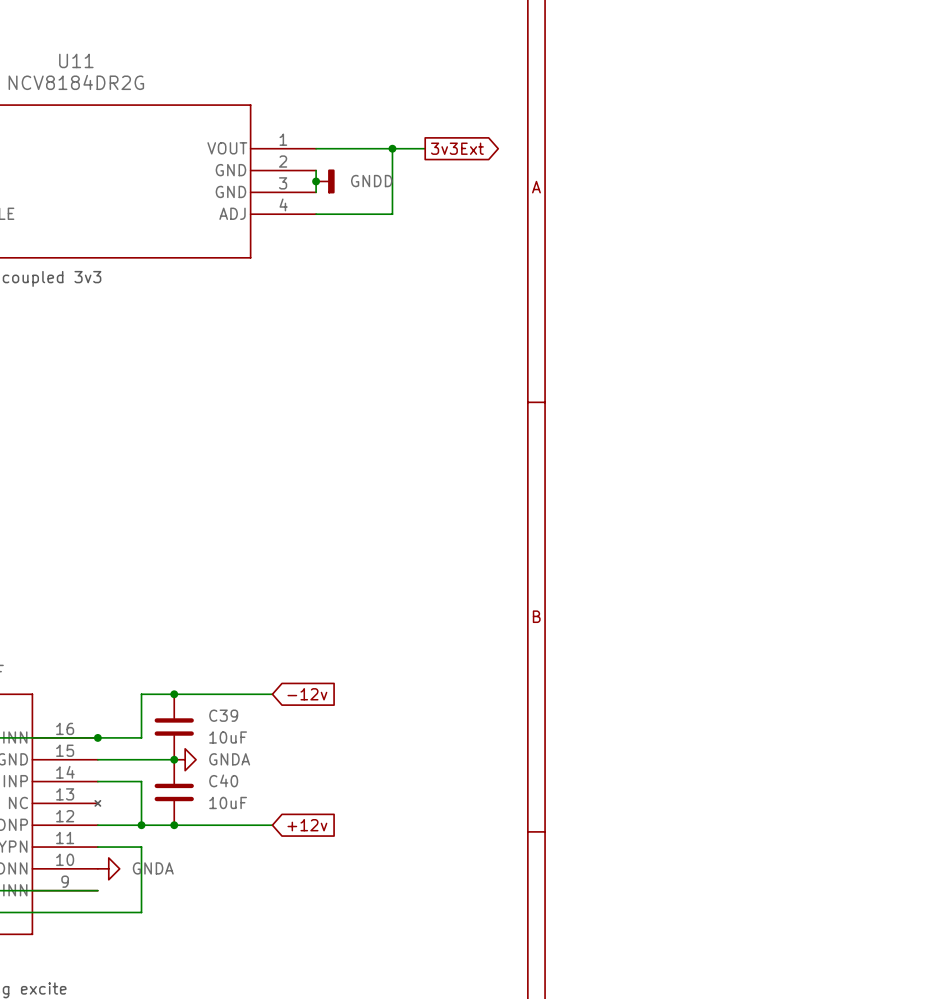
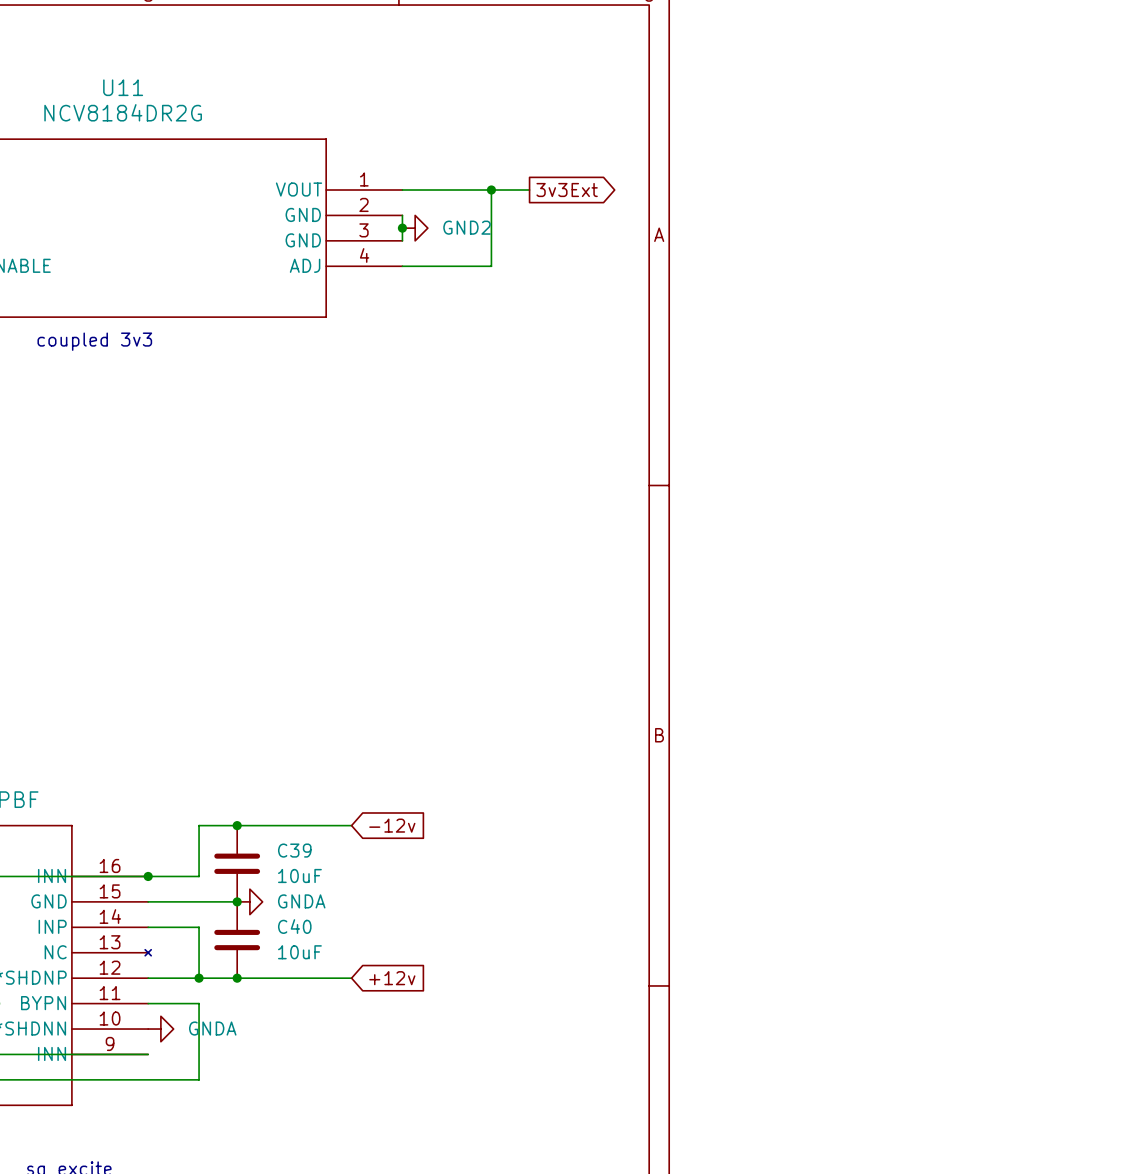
power symbol: GNDD (325, 181) -> GND2 (415, 228)

